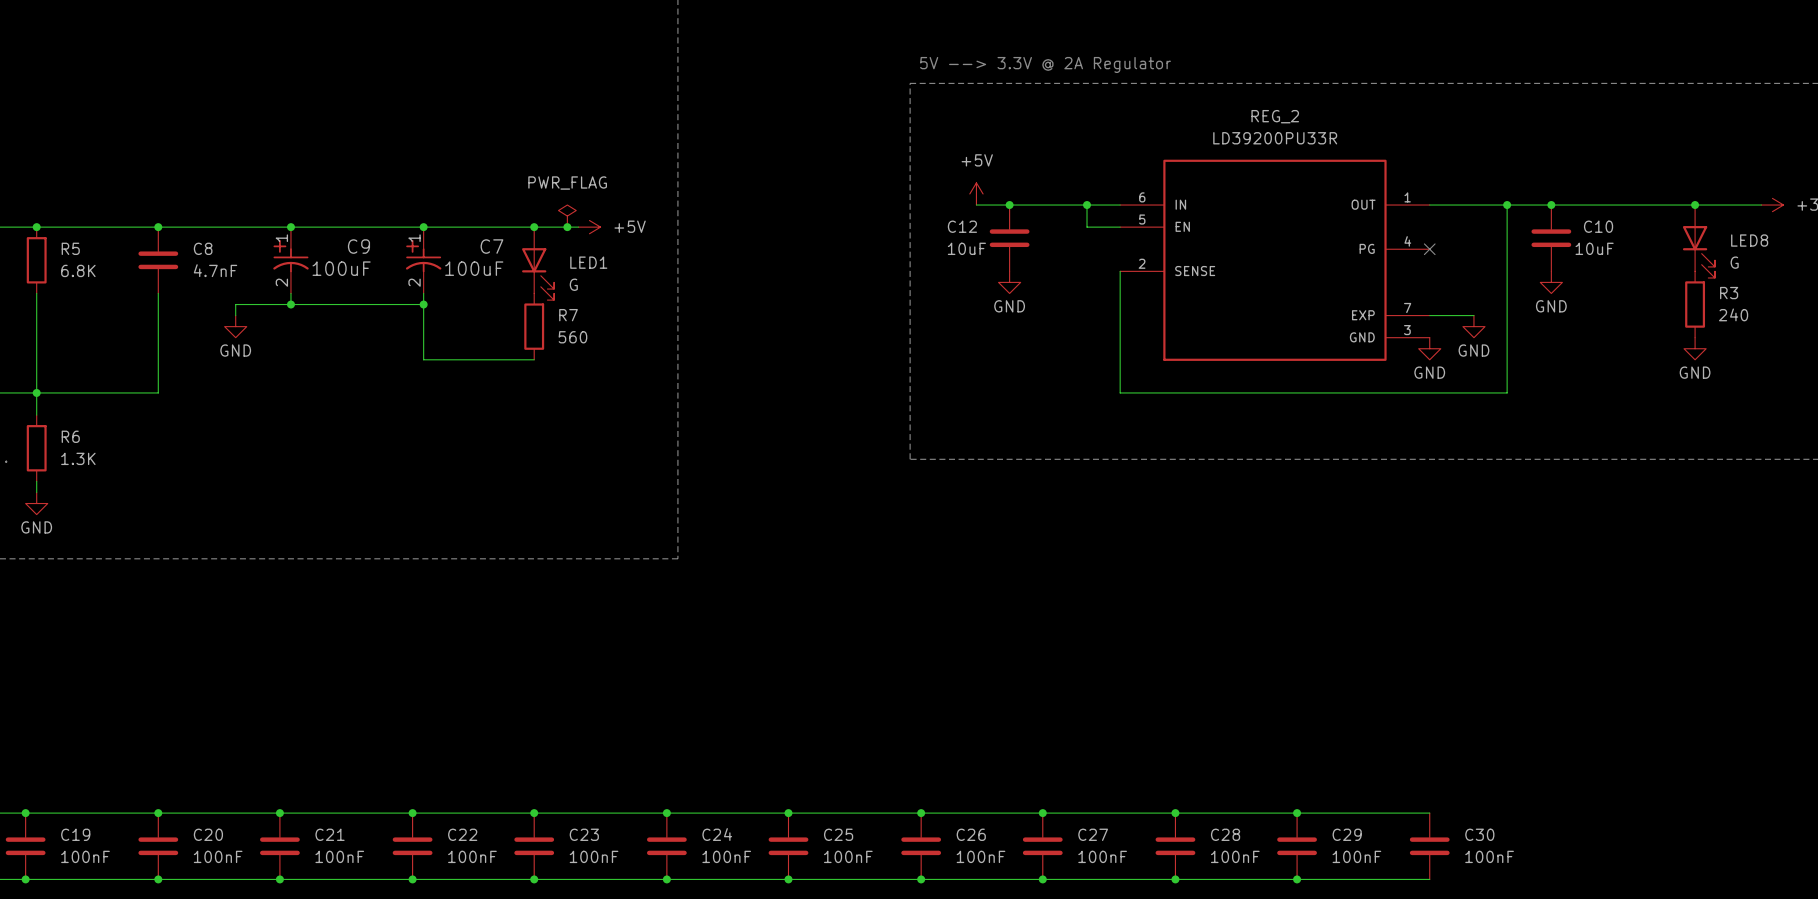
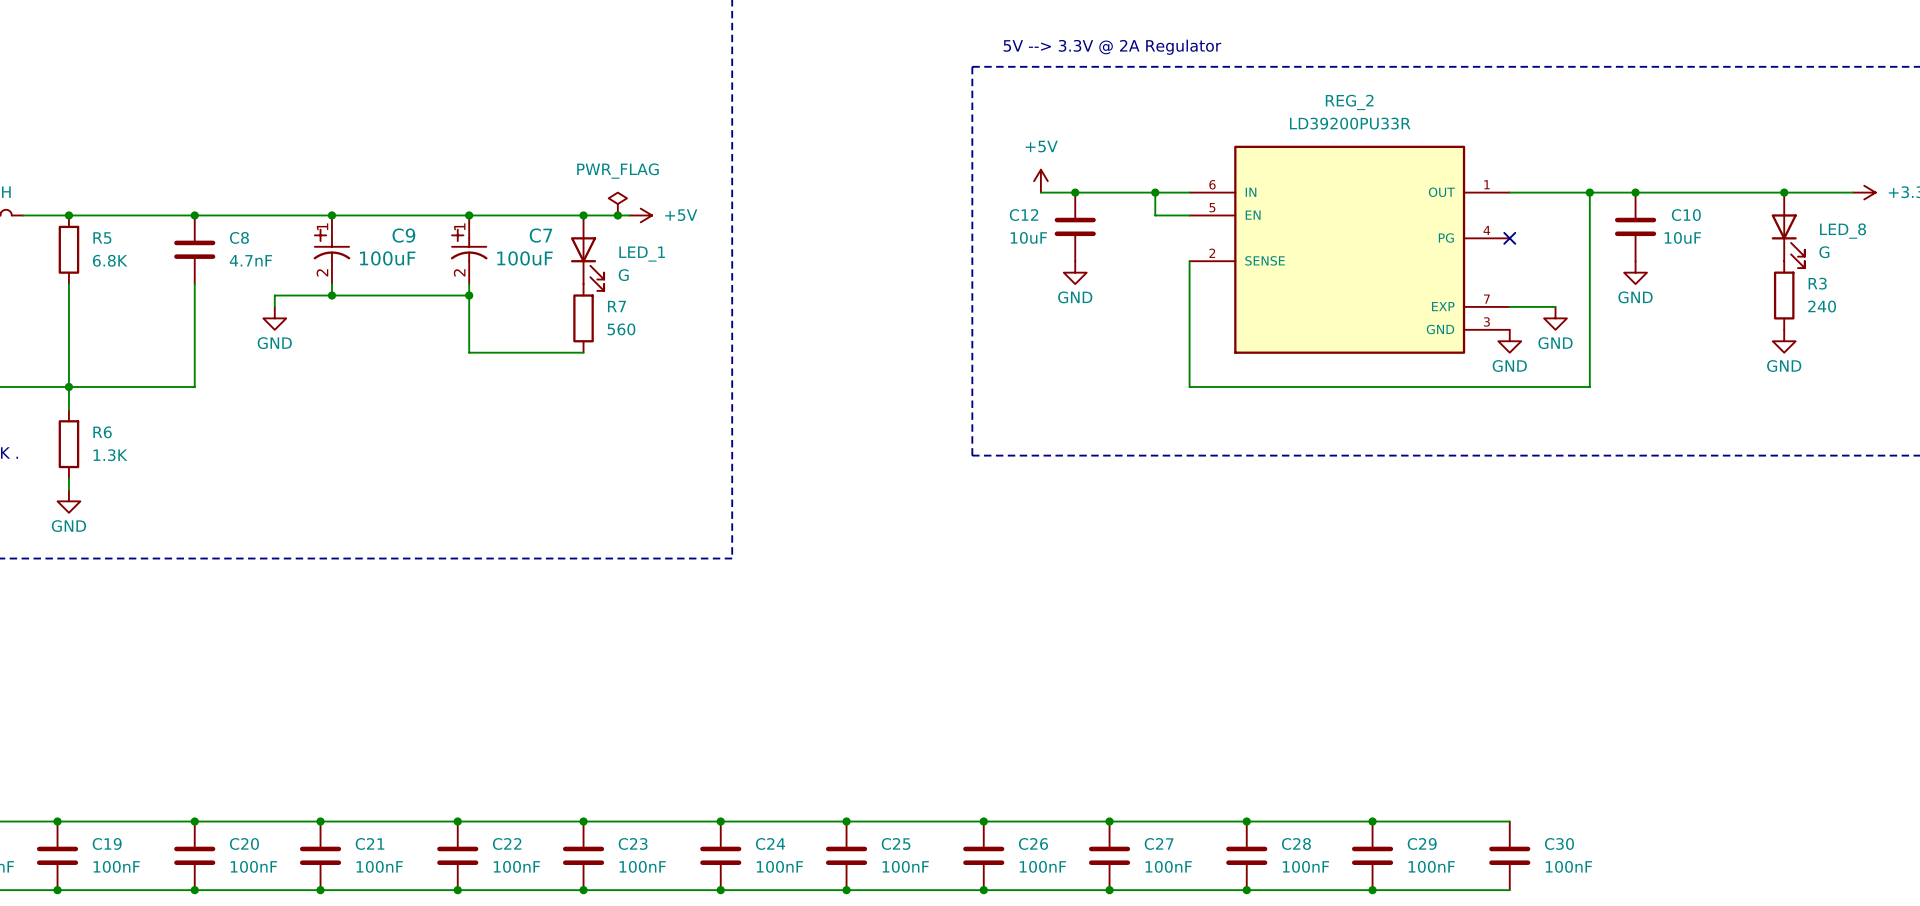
LED8 name: LED8 (1749, 240) -> LED_8 (1843, 231)
LED1 name: LED1 (588, 262) -> LED_1 (642, 254)

